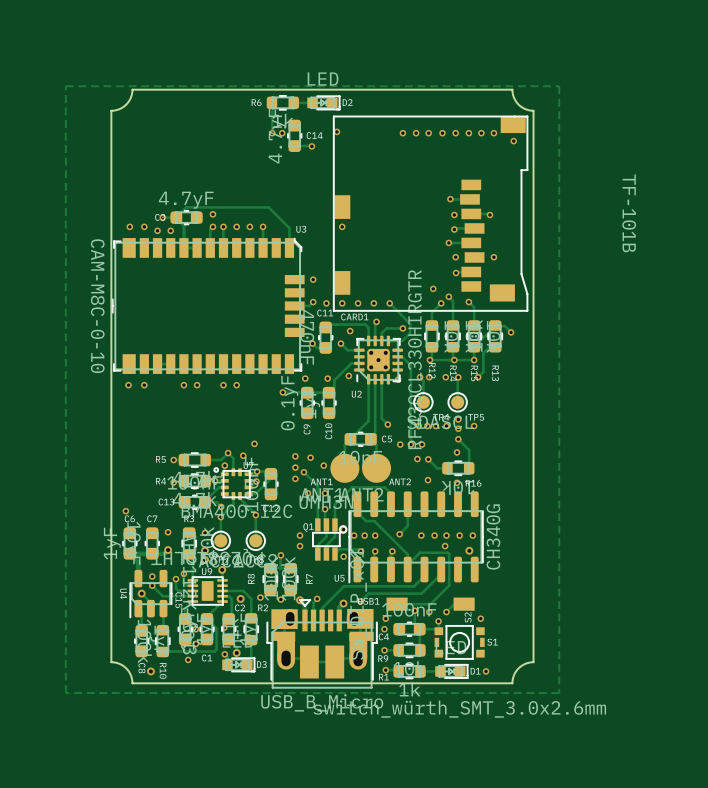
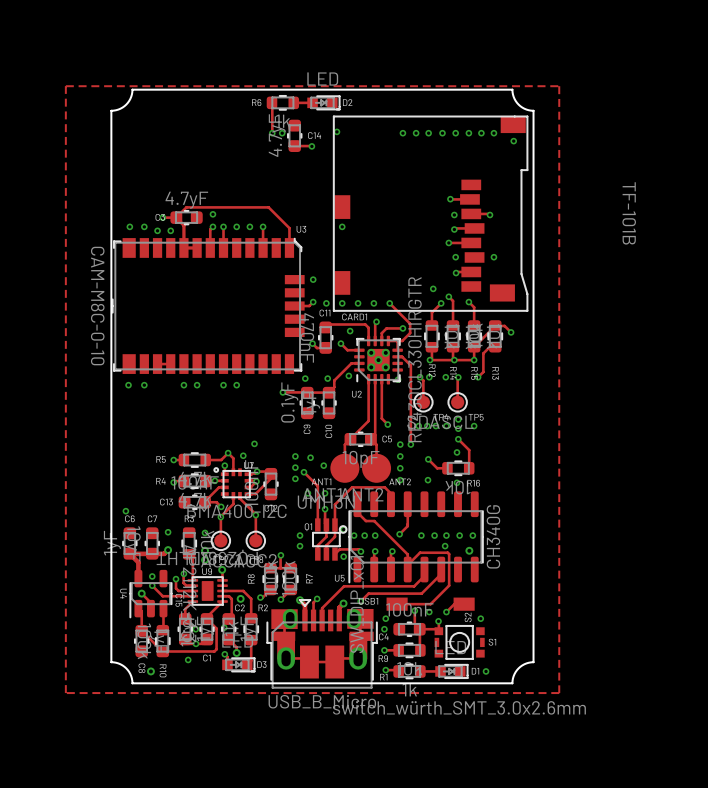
via: (422, 444) -> none
via: none -> (400, 456)
via: (417, 459) -> none
via: none -> (400, 468)
via: none -> (400, 480)

